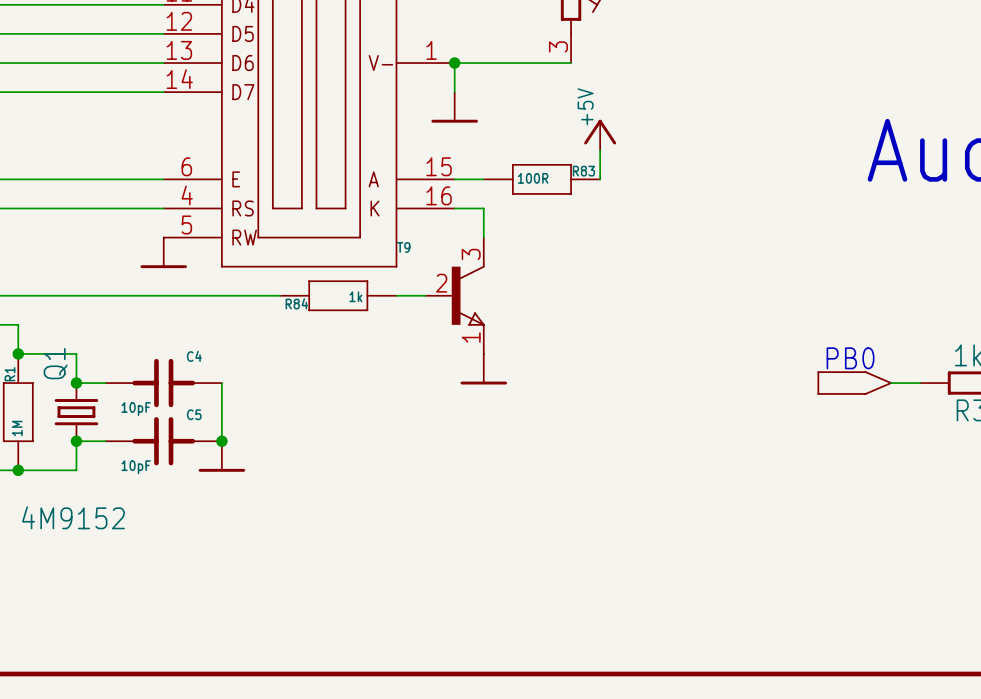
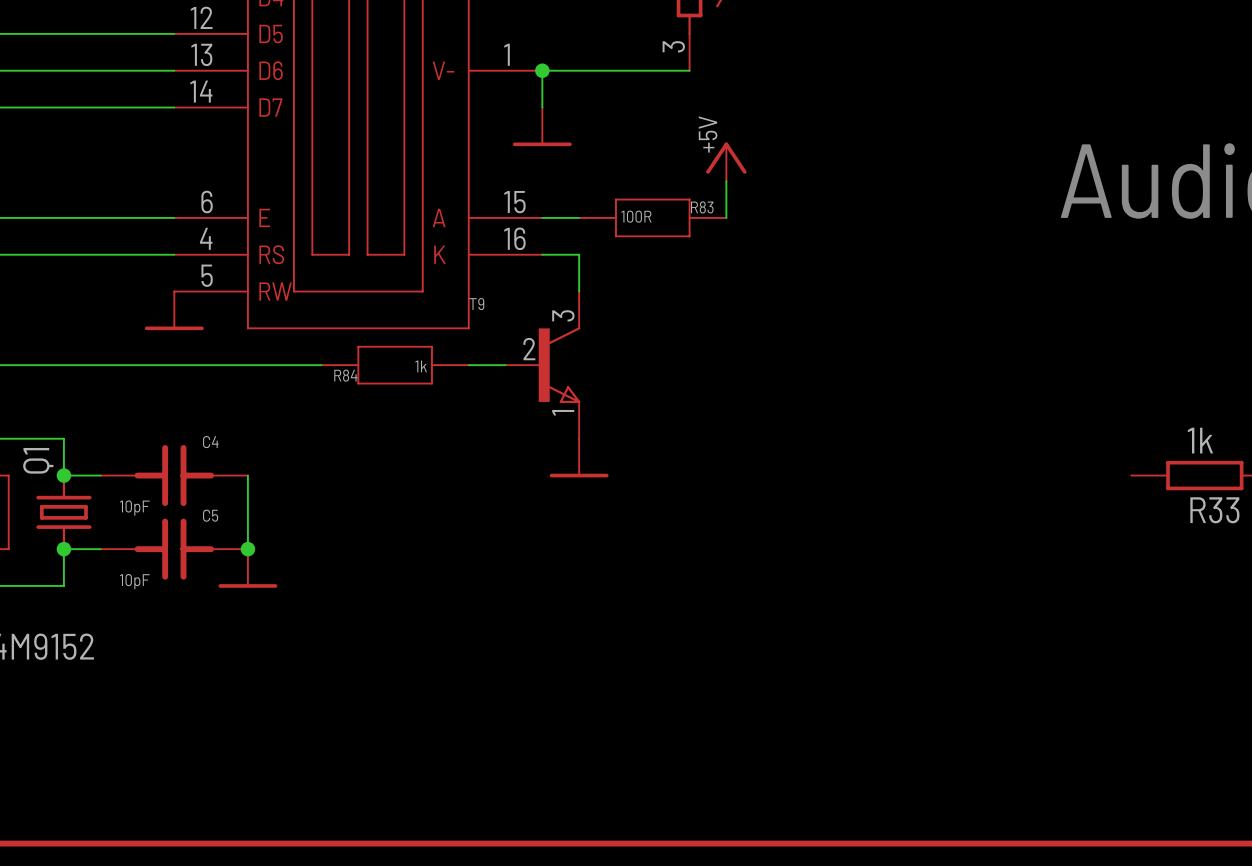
text: PB0 (850, 358) -> none
line: (818, 372) (818, 393) (865, 393) (891, 383) (865, 372) (818, 372) -> none
wire: (891, 383) (920, 383) -> none

